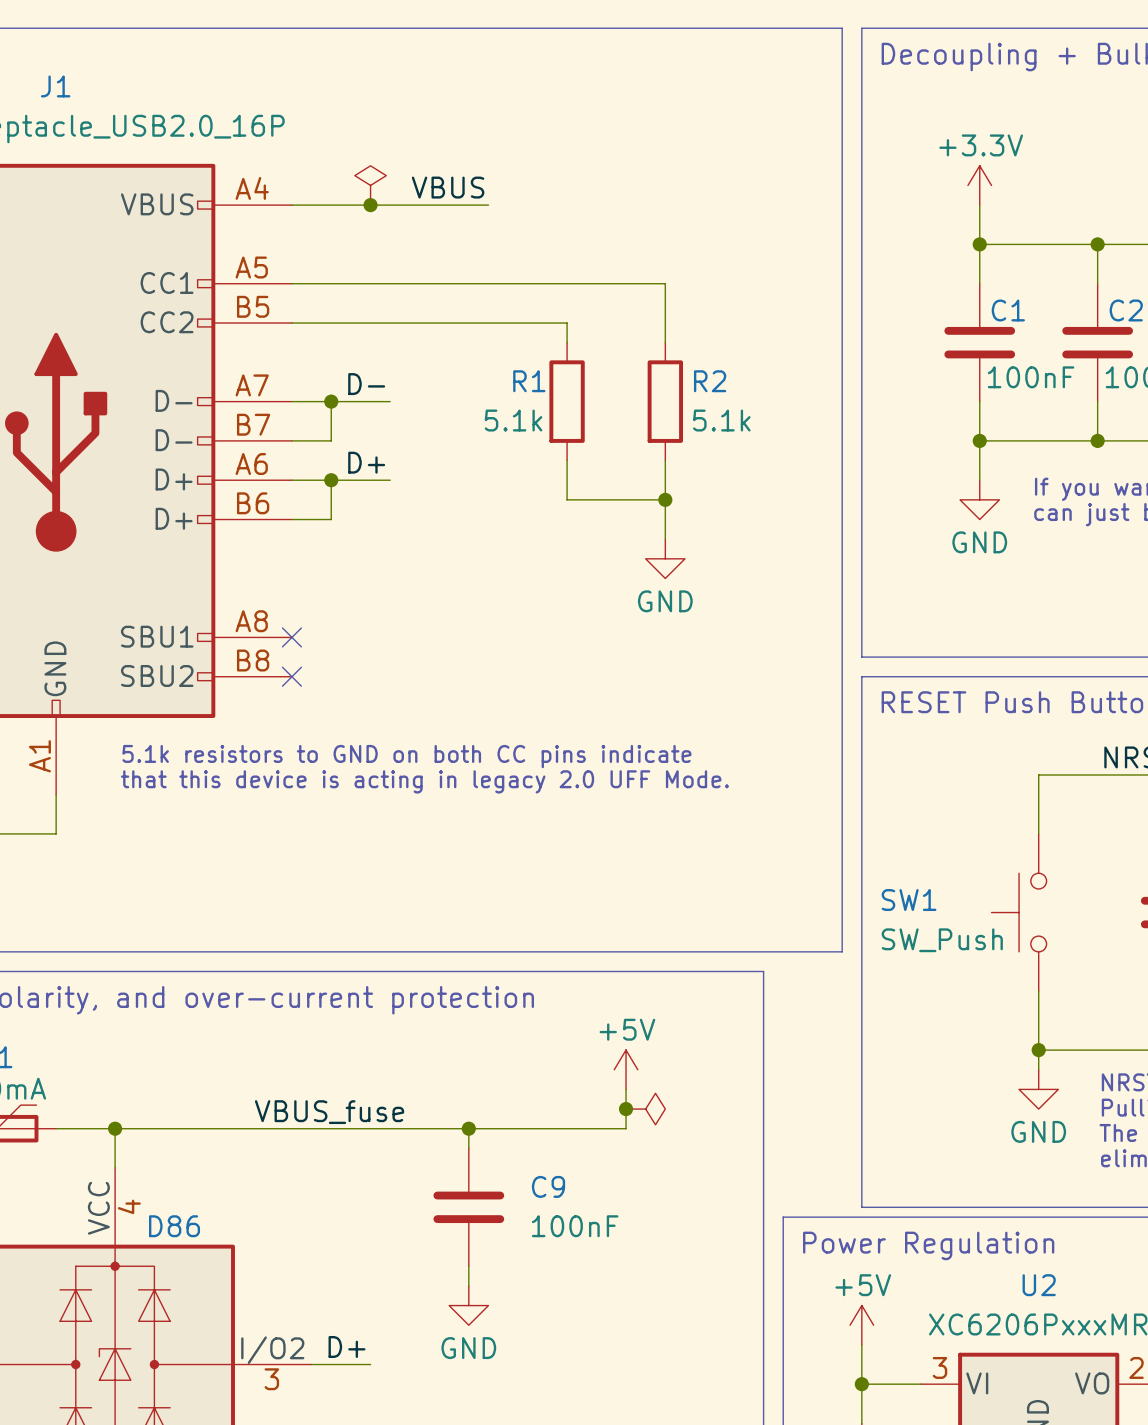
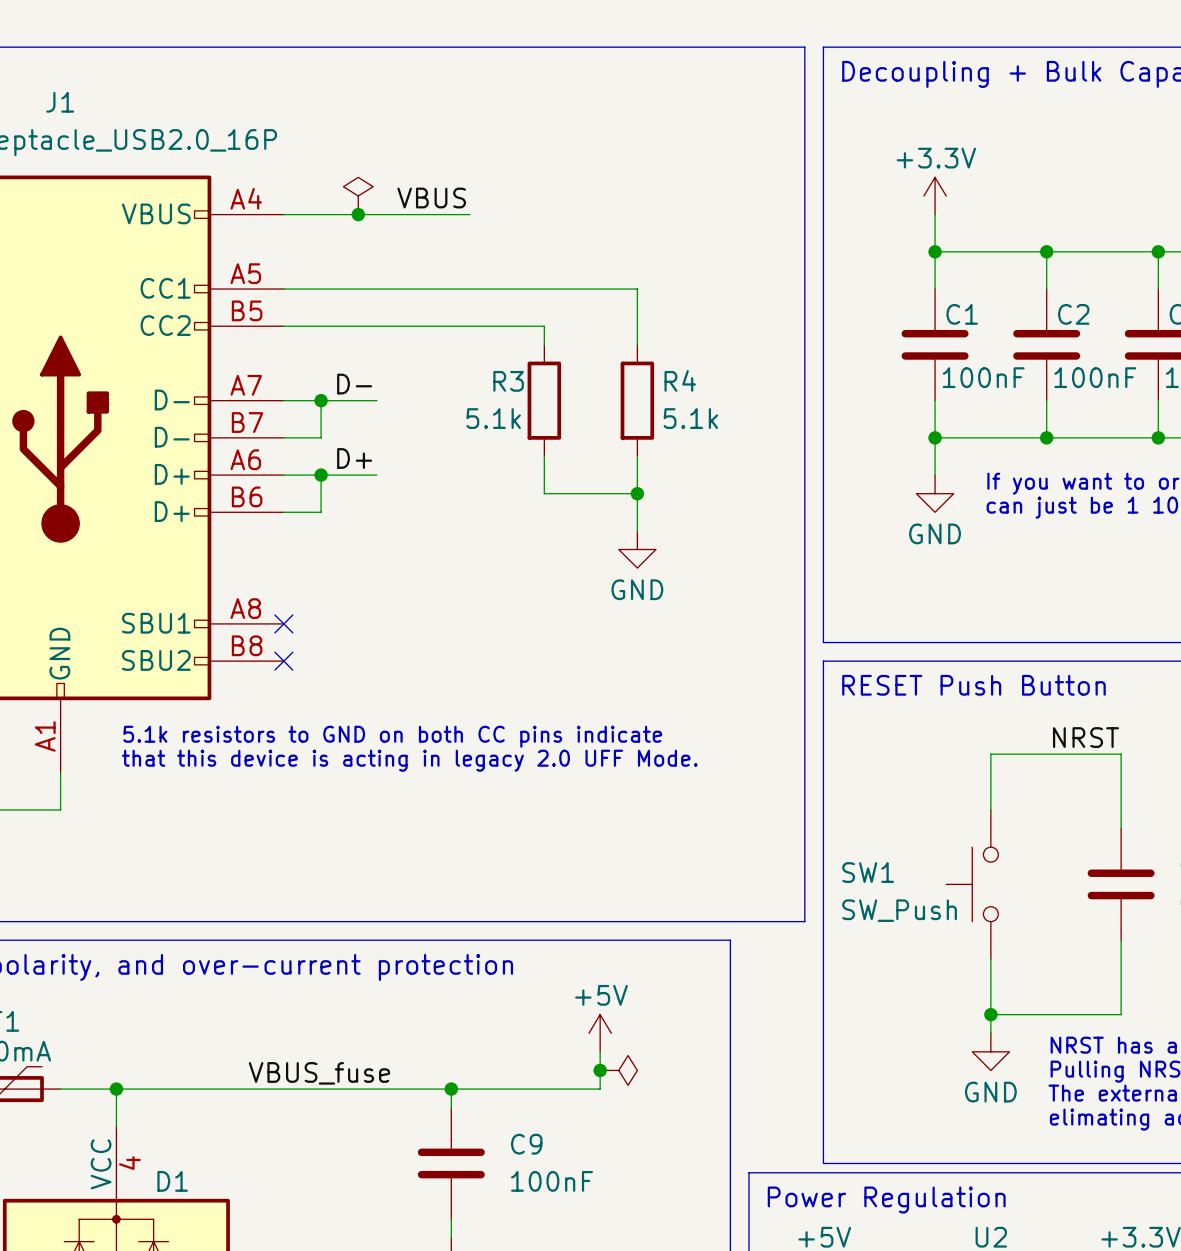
R1 name: R1 (529, 381) -> R3 (508, 381)
R2 name: R2 (710, 381) -> R4 (680, 380)
D86 name: D86 (174, 1226) -> D1 (172, 1181)

